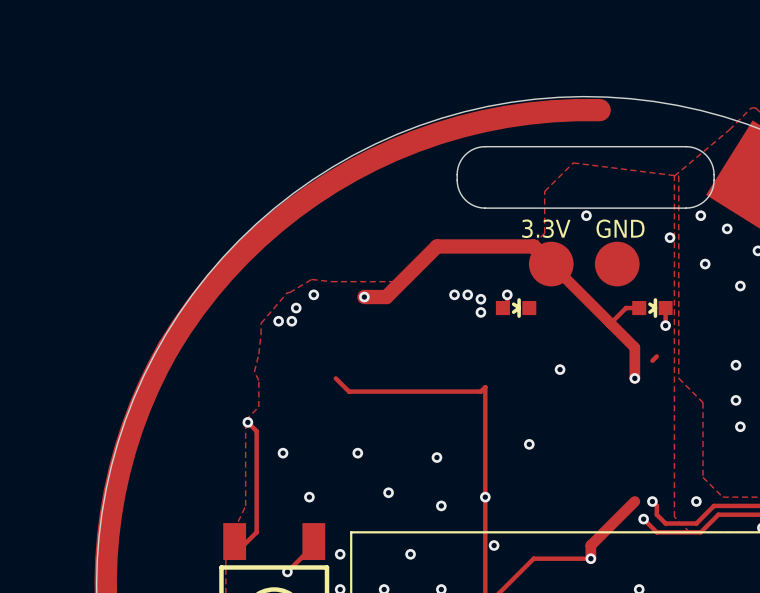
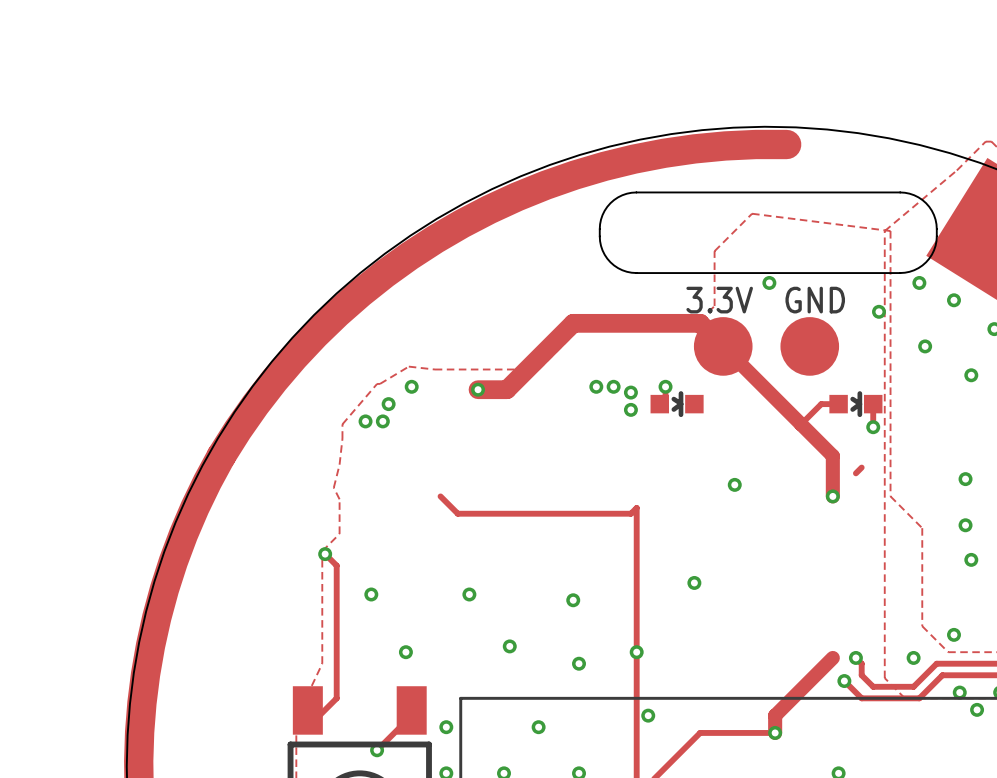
via: none -> (953, 634)
via: none -> (959, 692)
via: none -> (977, 709)

